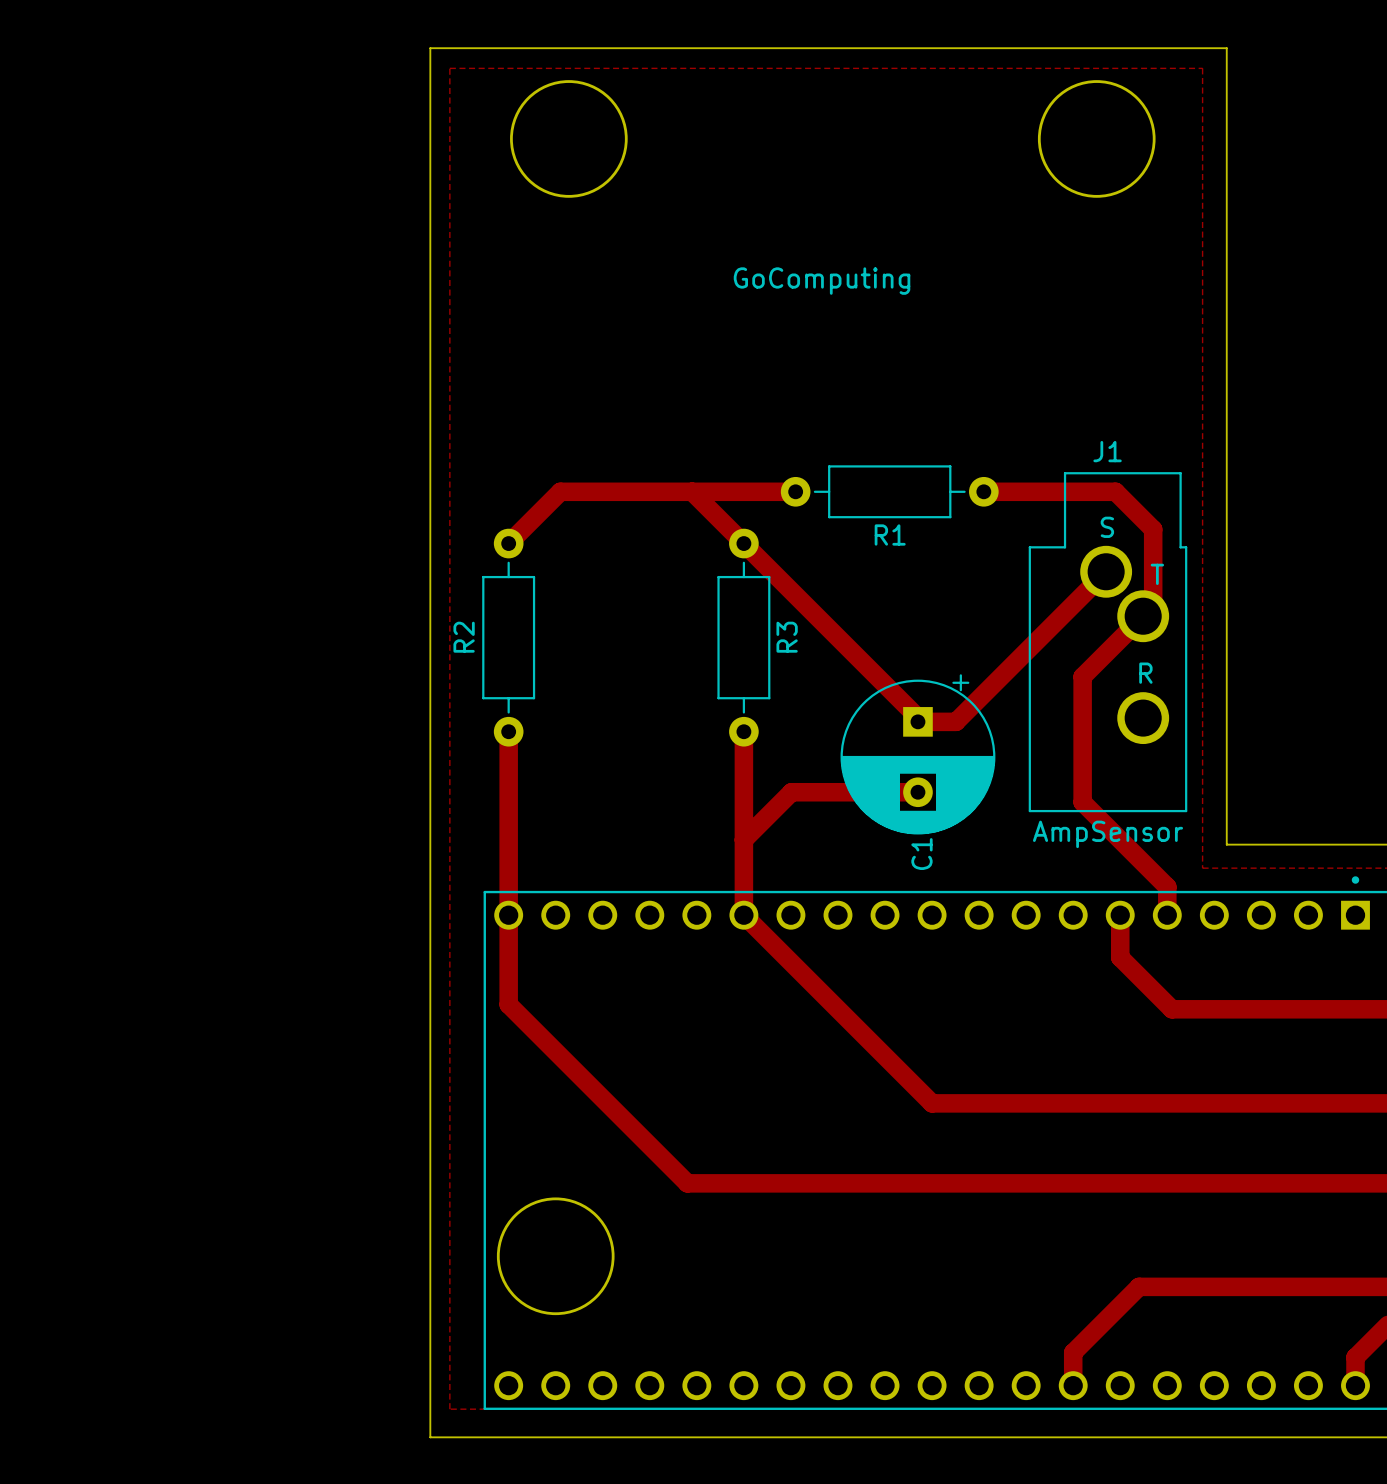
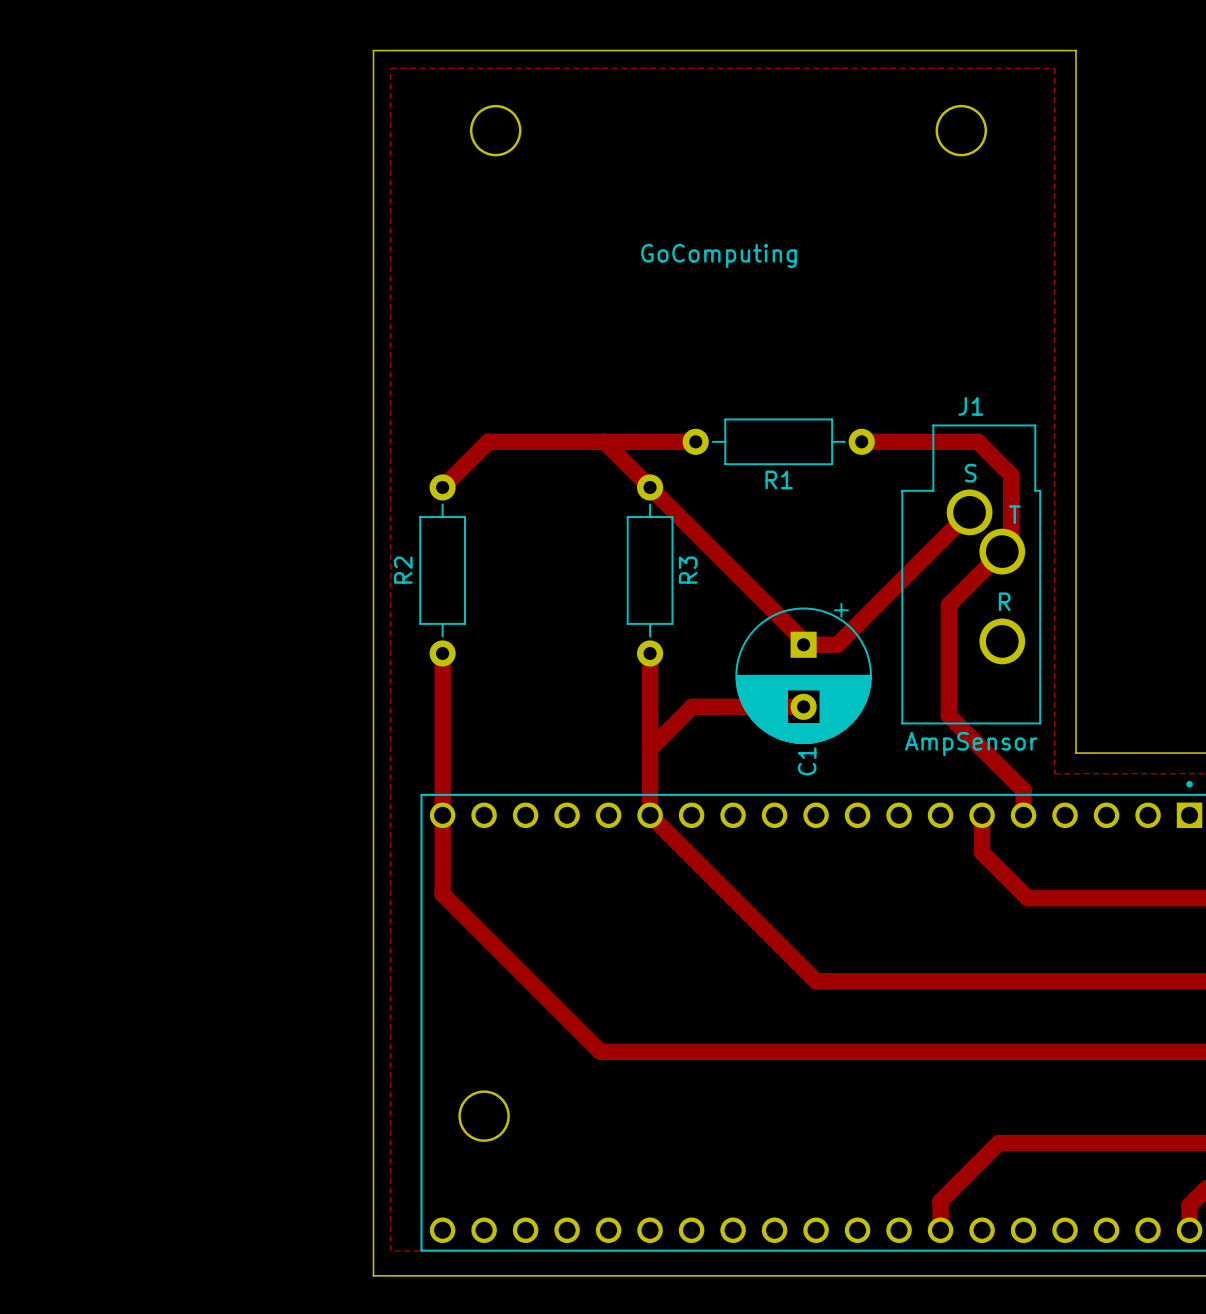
round board edge size: [510, 80, 628, 198] -> [469, 104, 522, 157]
round board edge size: [1037, 80, 1156, 198] -> [935, 104, 988, 157]
round board edge size: [496, 1197, 615, 1316] -> [458, 1090, 510, 1142]

